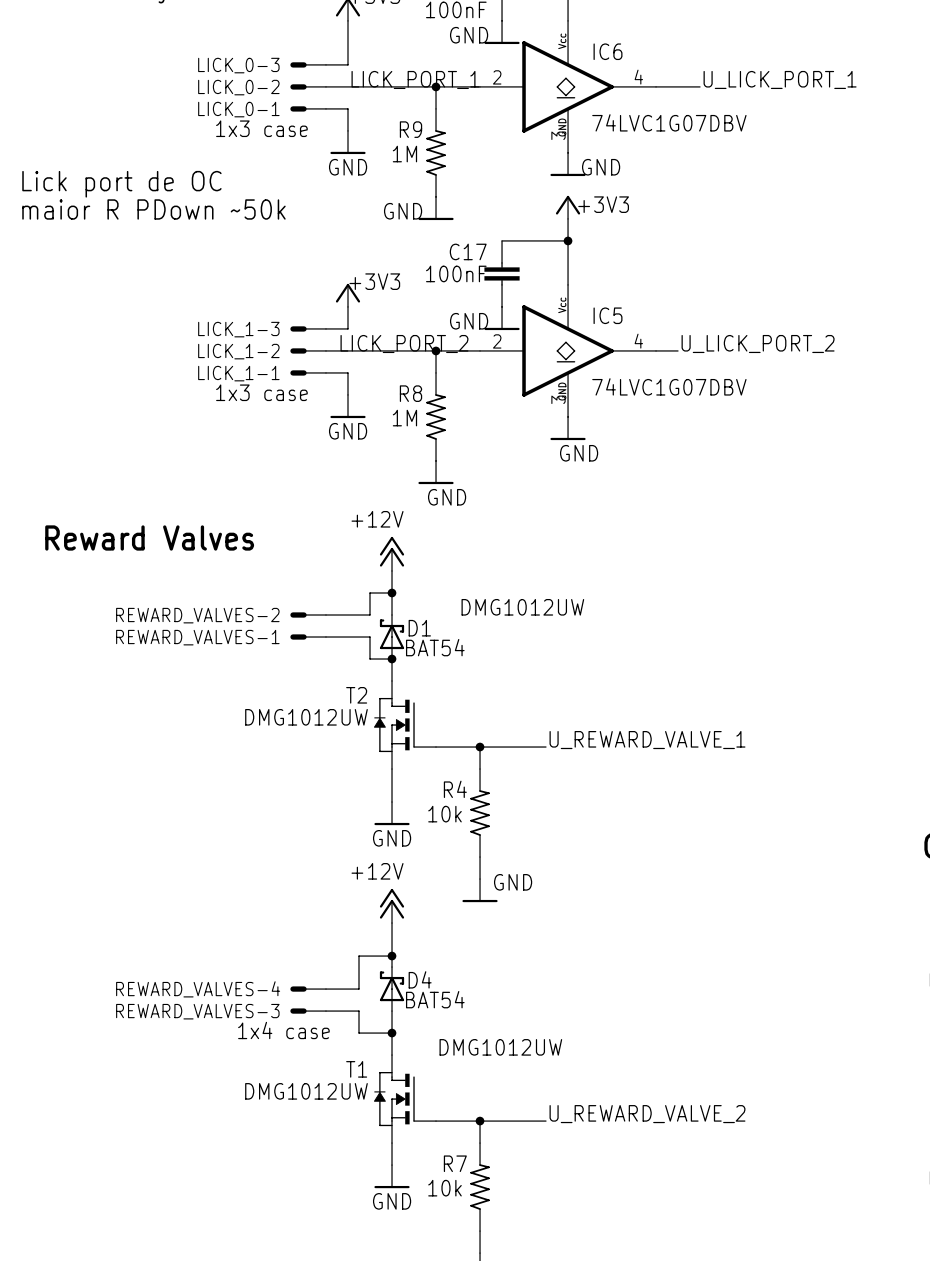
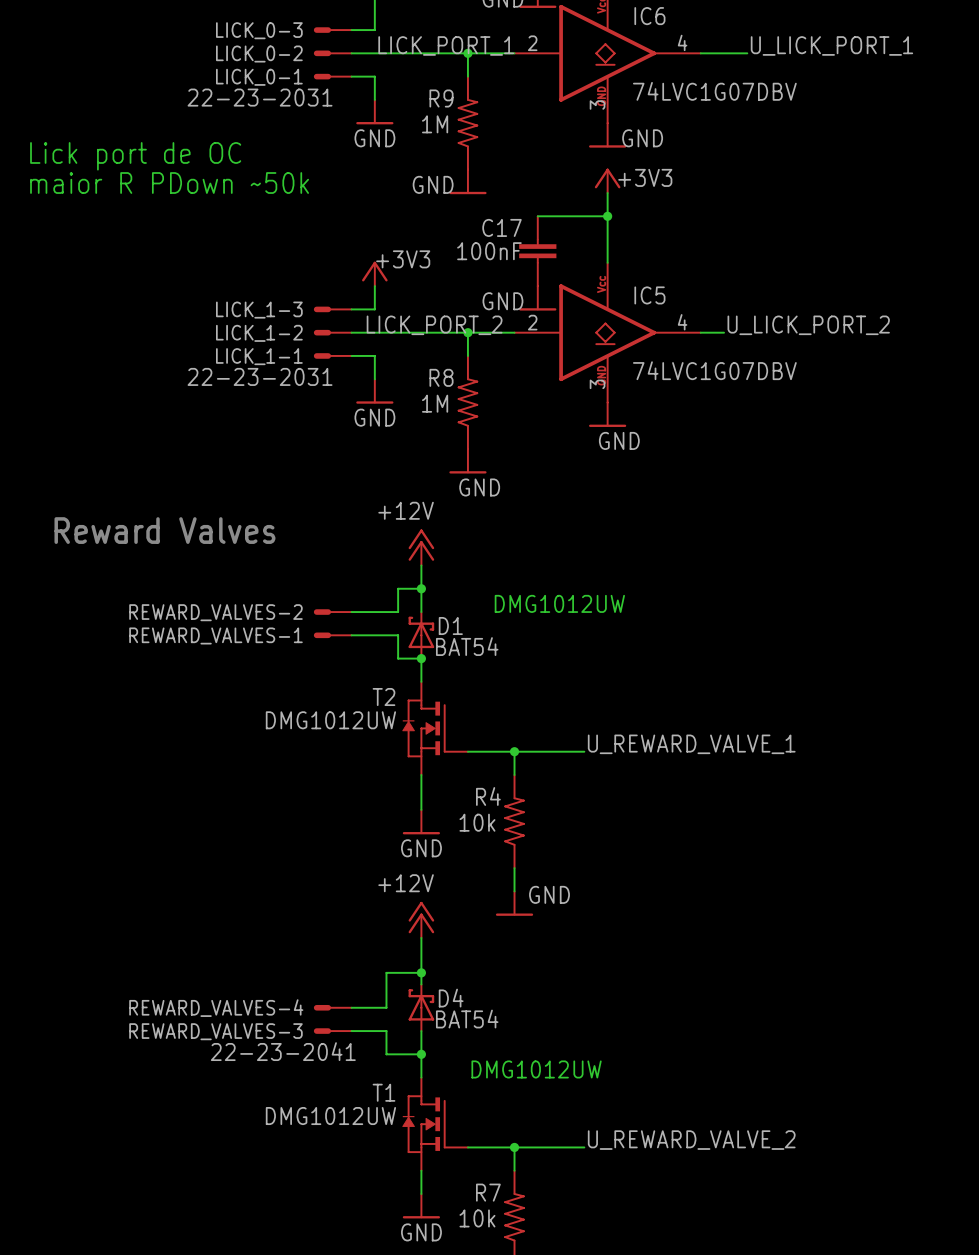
LICK_0-1 value: 1x3 case (261, 128) -> 22-23-2031 (260, 97)
LICK_1-1 value: 1x3 case (261, 392) -> 22-23-2031 (260, 376)
REWARD_VALVES-1 value: 1x4 case (283, 1030) -> 22-23-2041 (283, 1051)

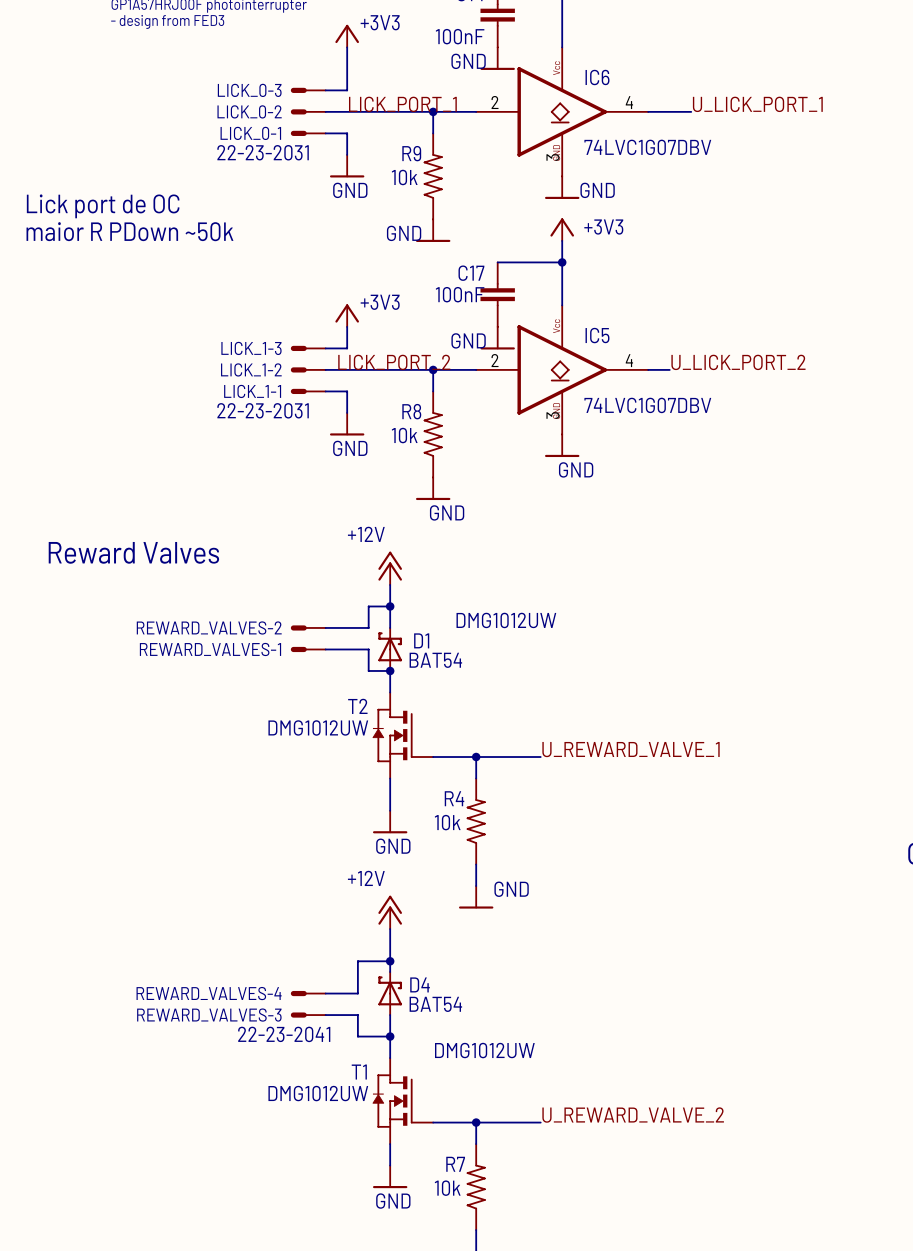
R9 value: 1M (435, 124) -> 10k (404, 177)
R8 value: 1M (435, 403) -> 10k (404, 435)

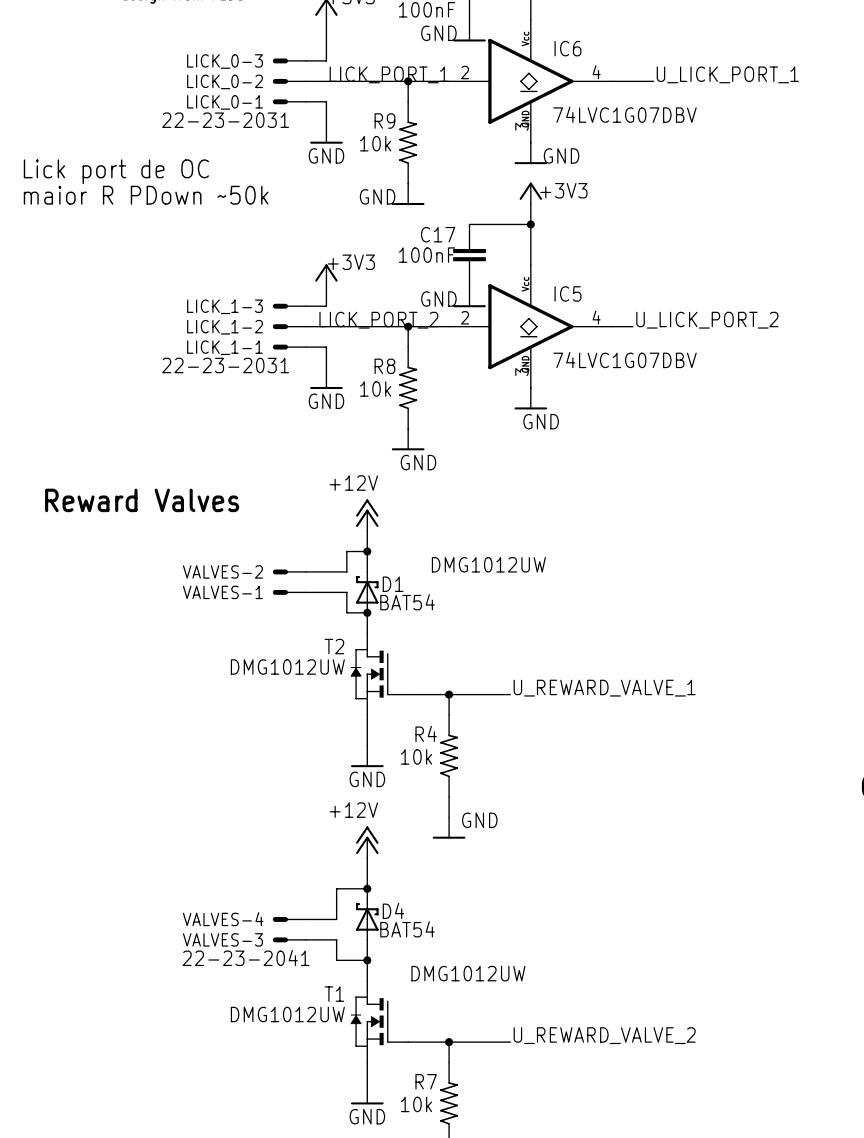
REWARD_VALVES-2 name: REWARD_VALVES-2 (209, 627) -> VALVES-2 (222, 571)
REWARD_VALVES-1 name: REWARD_VALVES-1 (210, 649) -> VALVES-1 (222, 592)
REWARD_VALVES-4 name: REWARD_VALVES-4 (209, 993) -> VALVES-4 (223, 919)
REWARD_VALVES-3 name: REWARD_VALVES-3 (209, 1015) -> VALVES-3 (222, 939)

